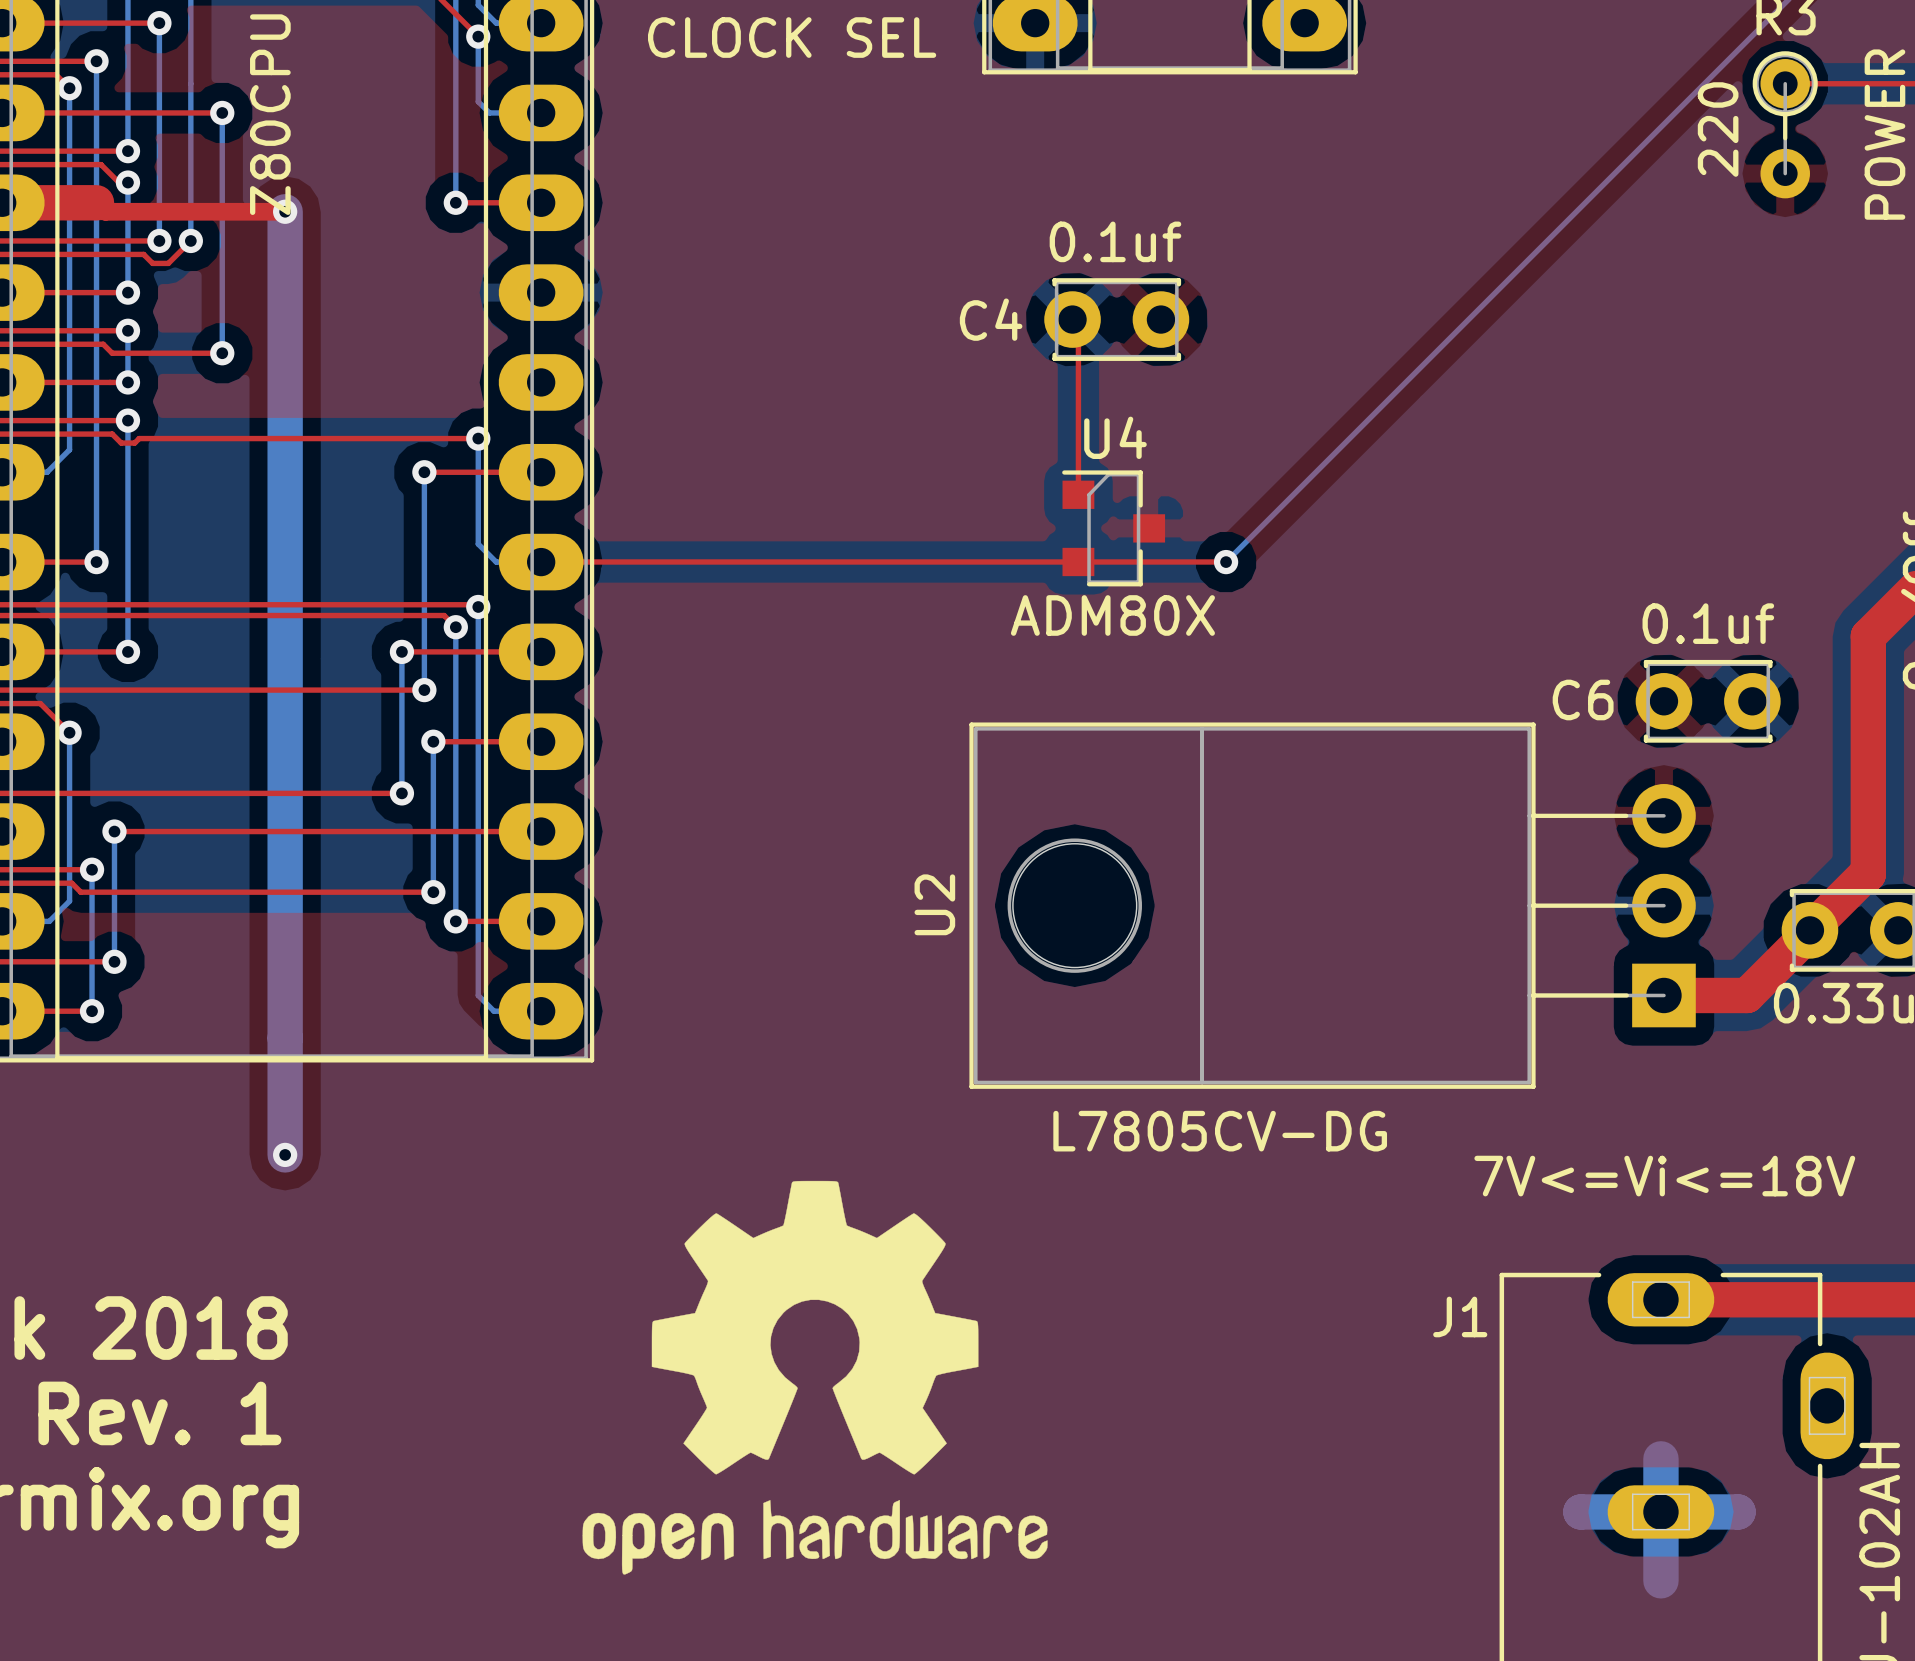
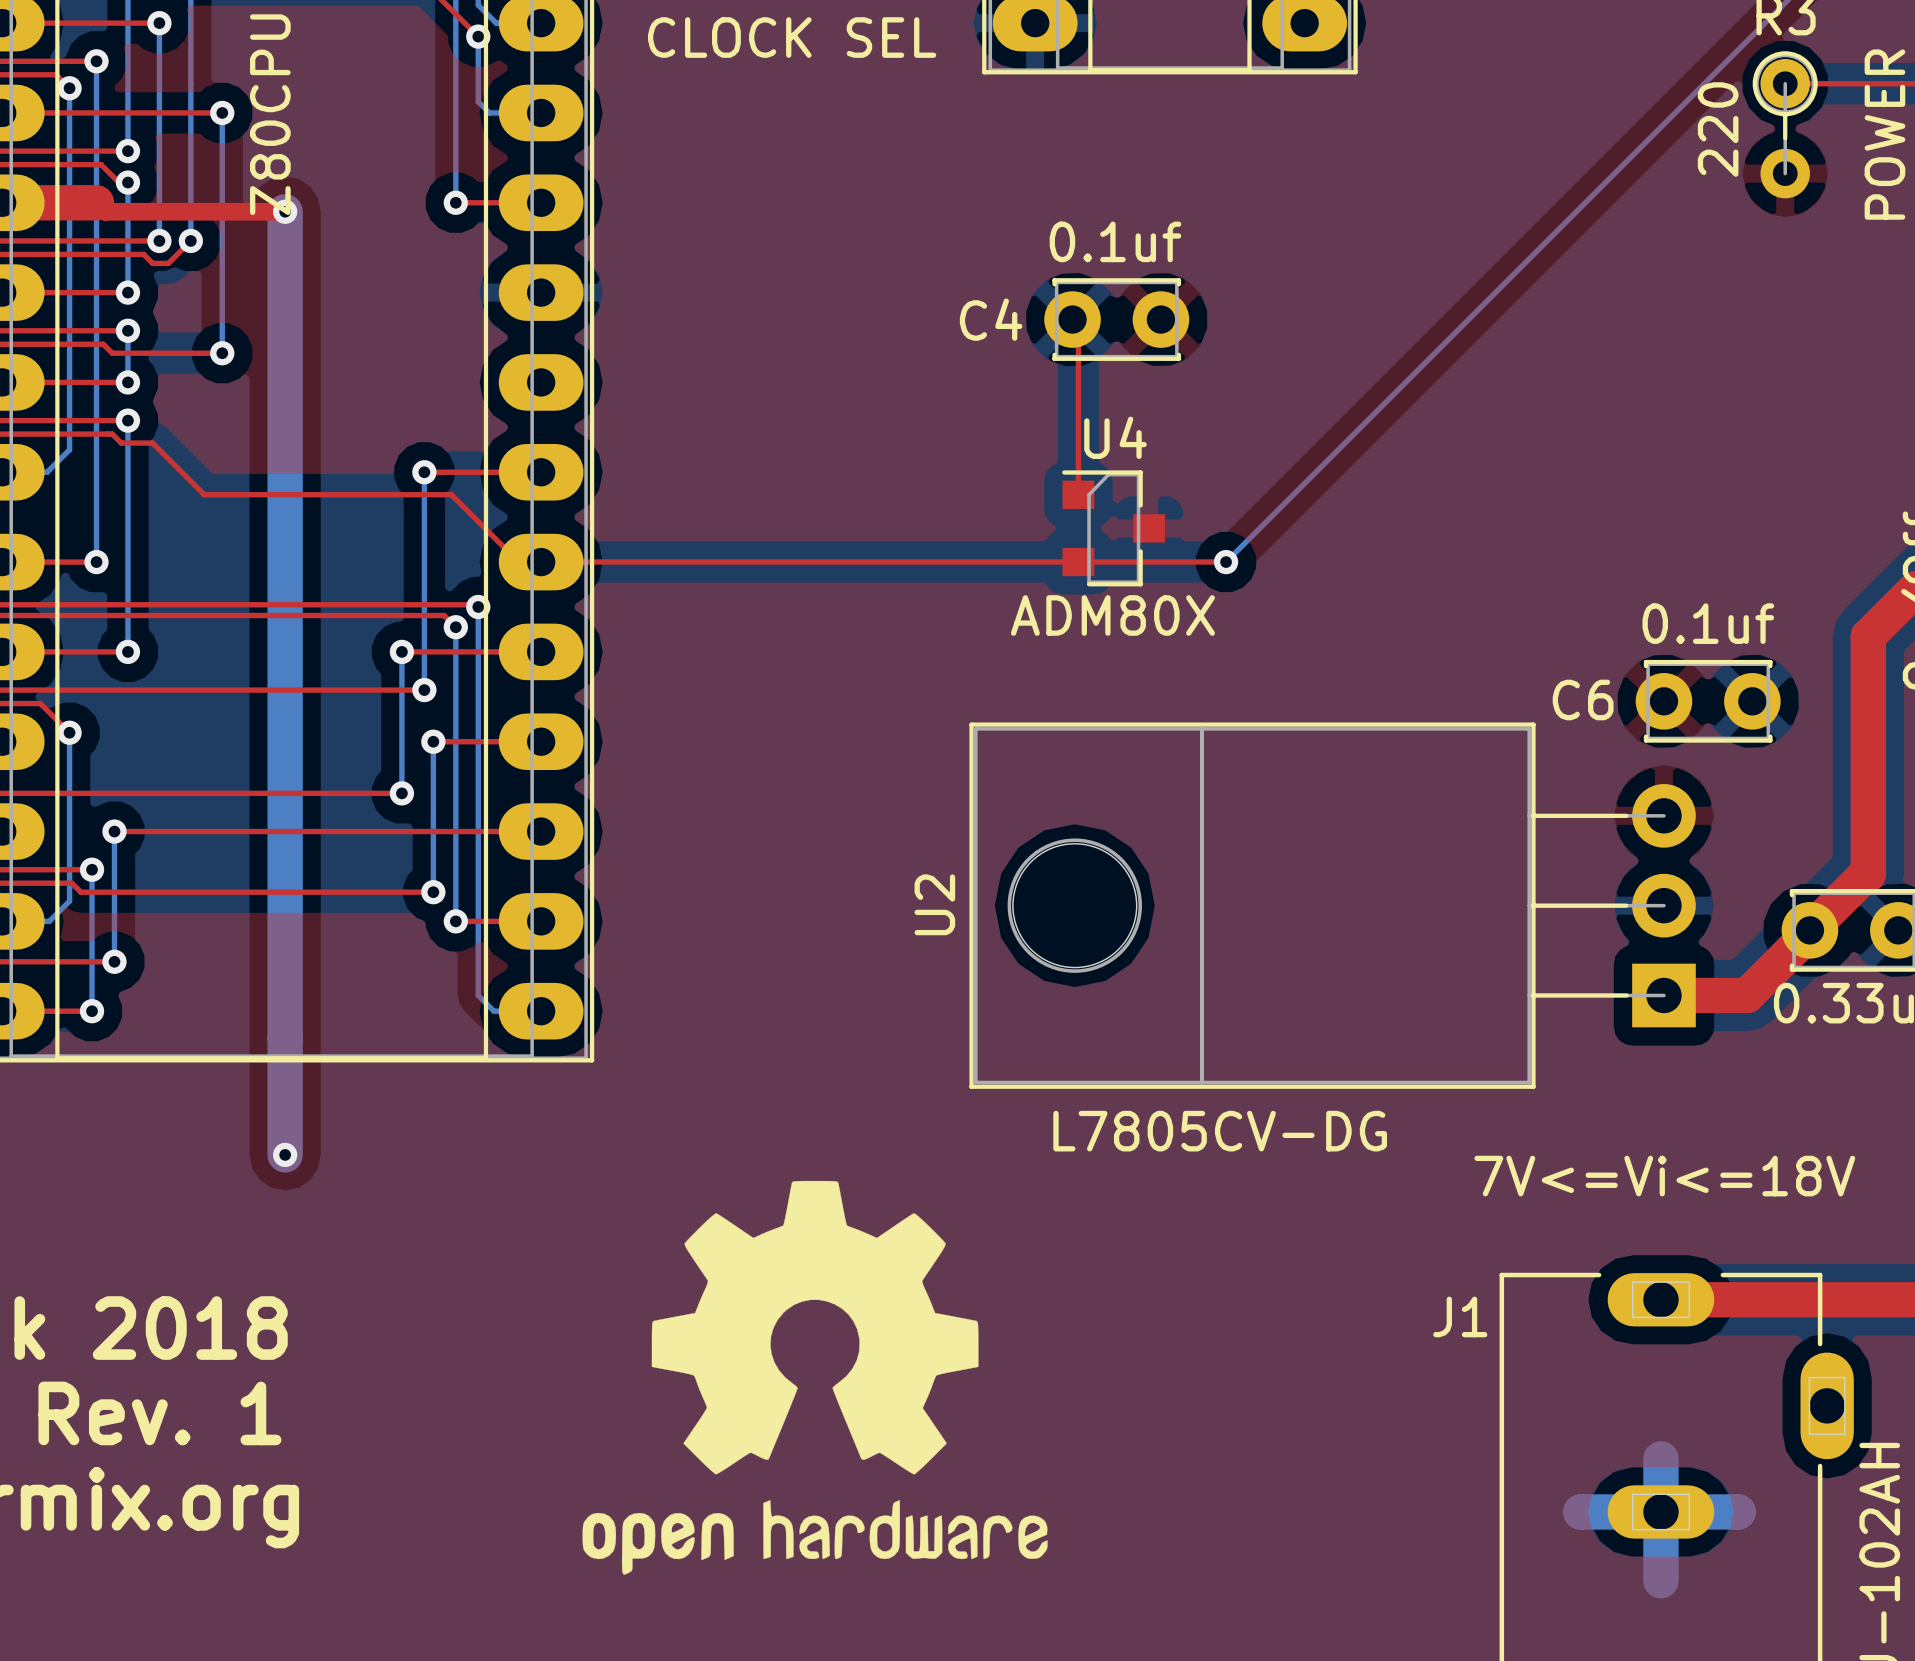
bottom track: (478, 438) (478, 544) (496, 562) (541, 562) -> none
top track: (478, 438) (139, 438) (134, 443) -> (541, 561) (518, 562) (451, 494) (204, 494) (152, 443) (134, 443)
via: (478, 438) -> none

